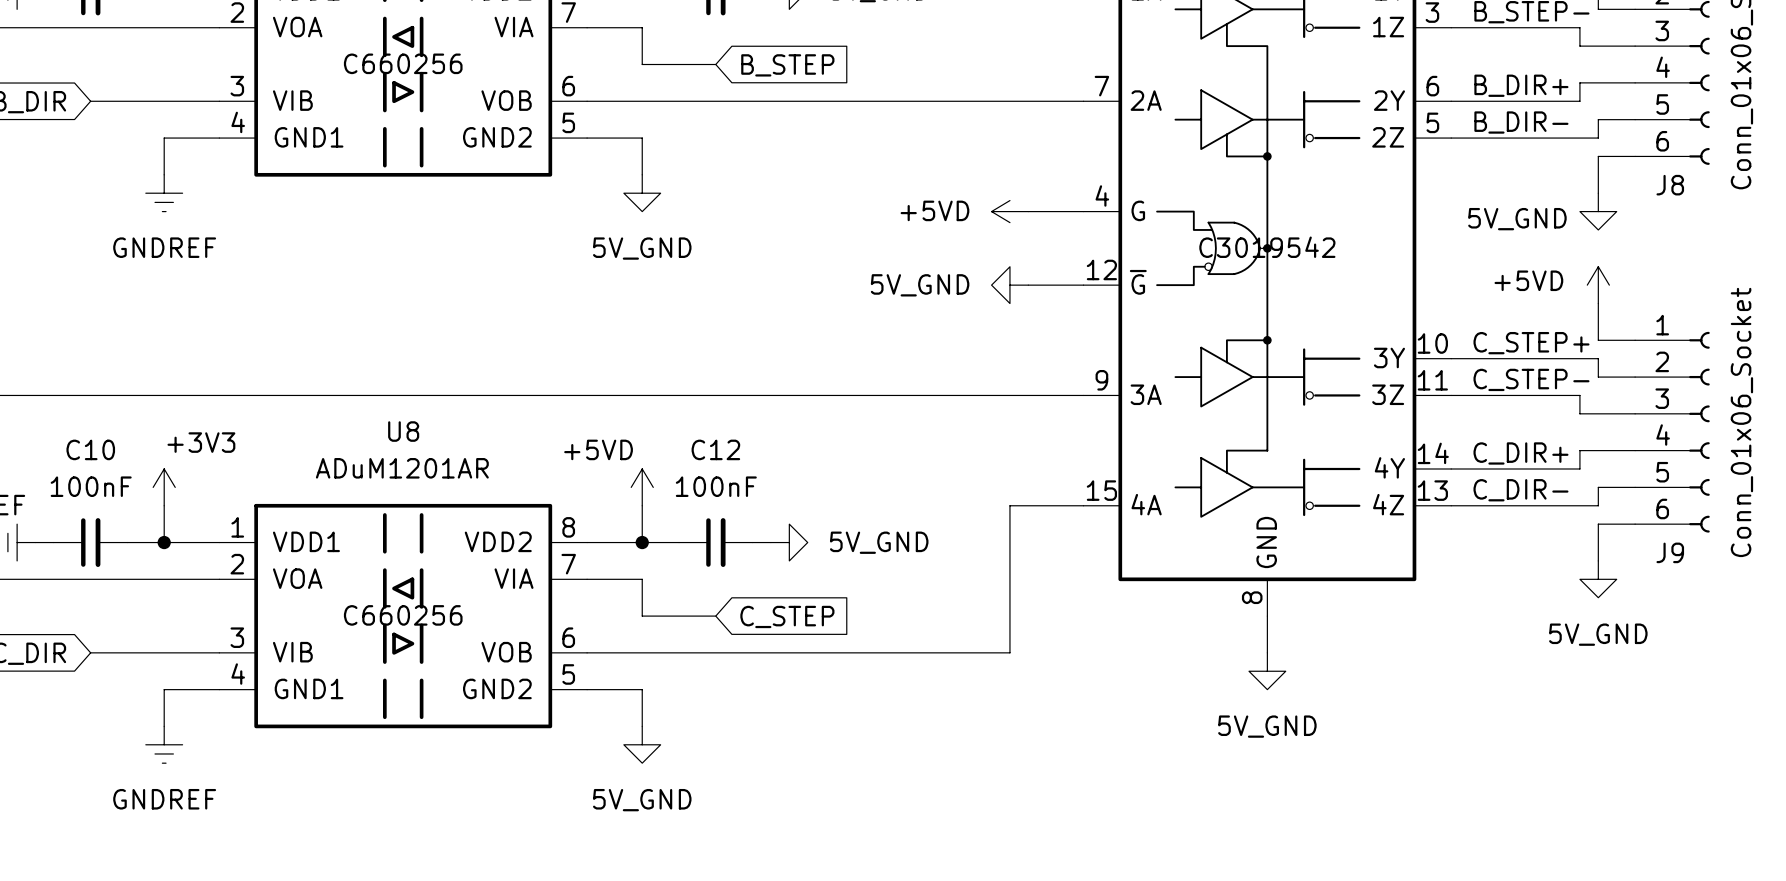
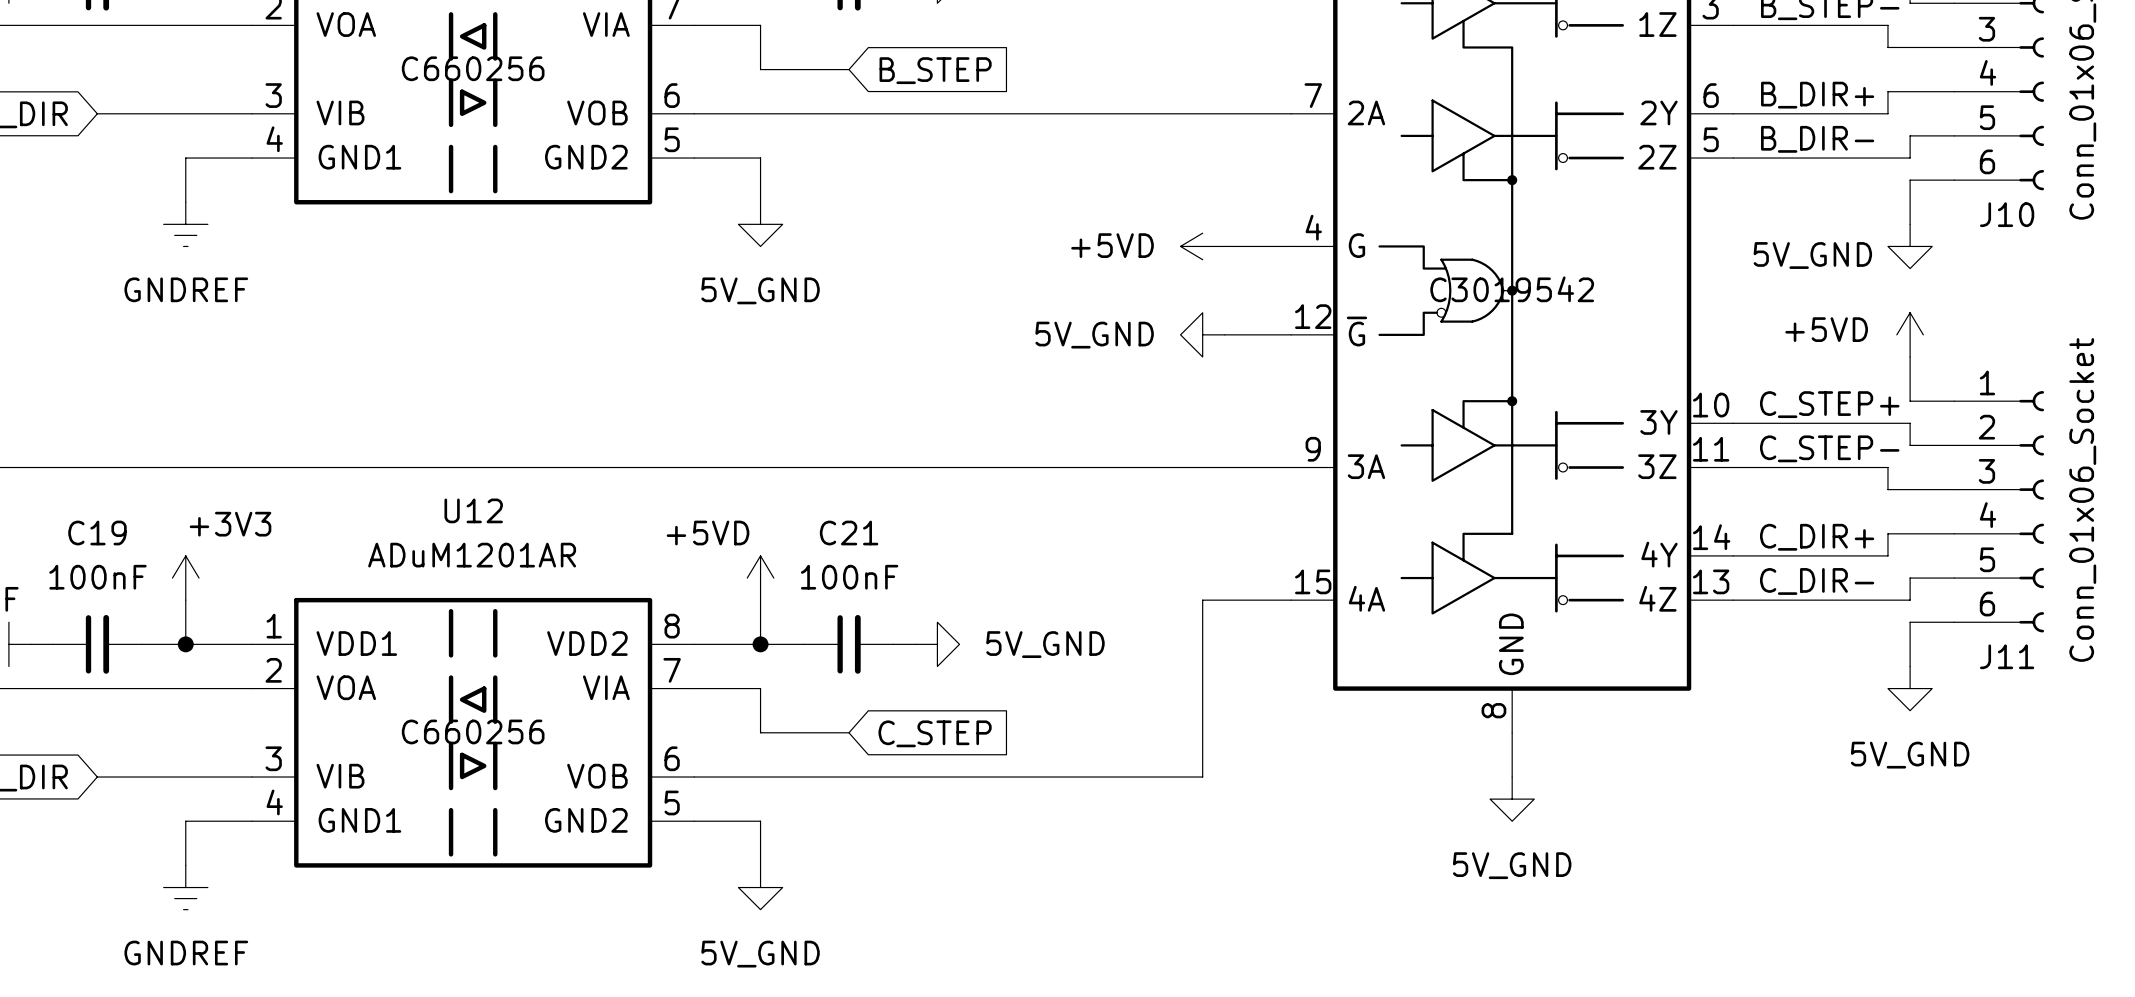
J8 name: J8 (1670, 185) -> J10 (2007, 214)
U8 name: U8 (403, 431) -> U12 (473, 510)
C10 name: C10 (90, 449) -> C19 (97, 533)
C12 name: C12 (715, 449) -> C21 (849, 533)
J9 name: J9 (1670, 552) -> J11 (2007, 656)

